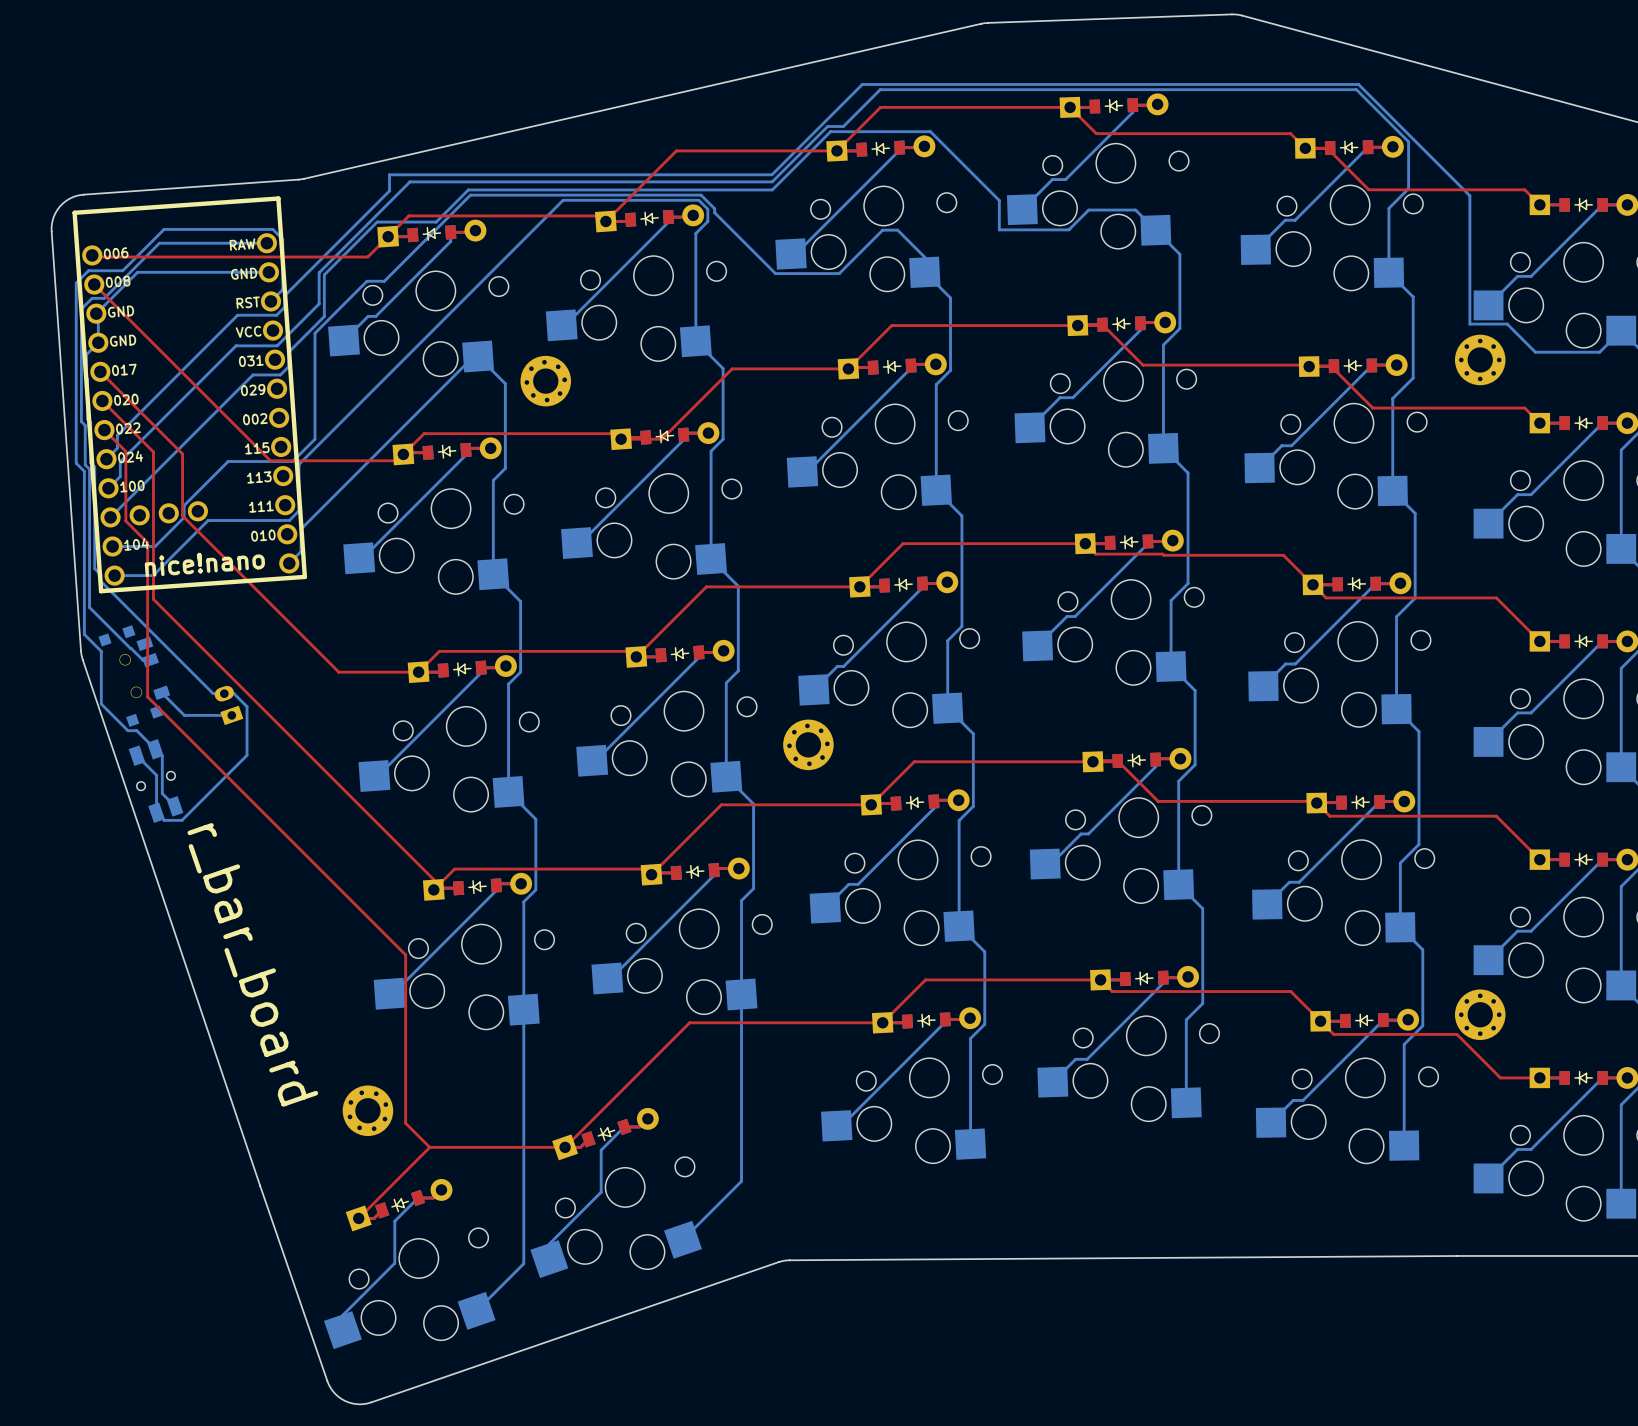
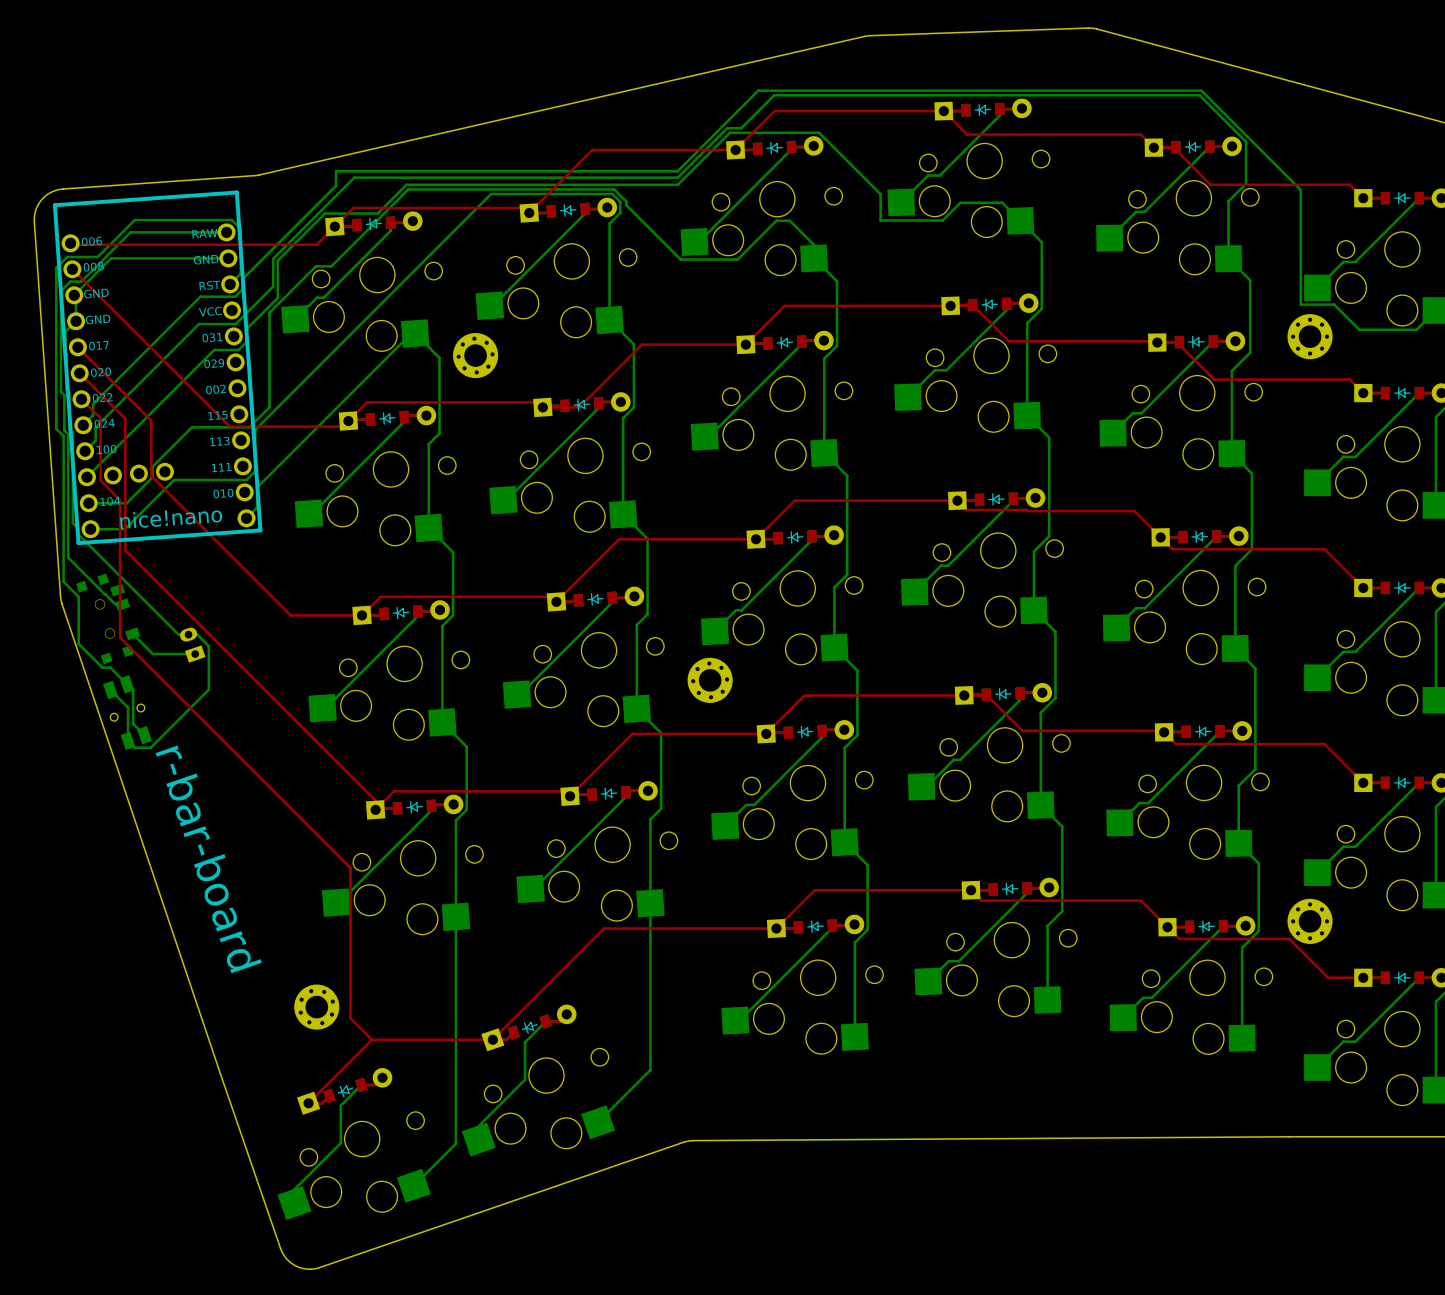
text: r_bar_board (252, 964) -> r-bar-board (208, 859)

